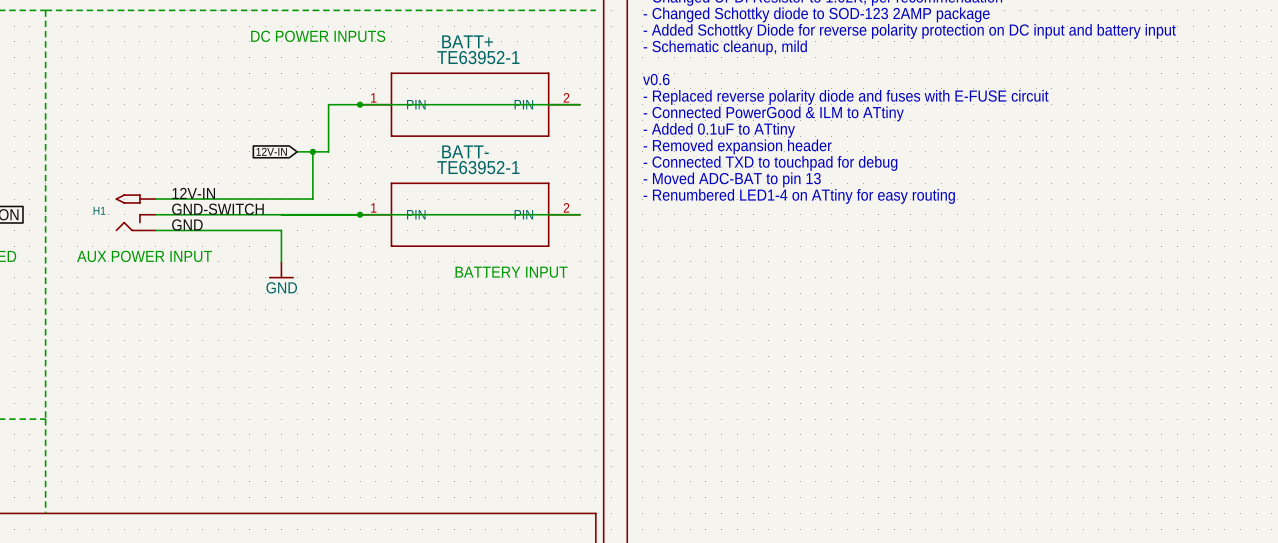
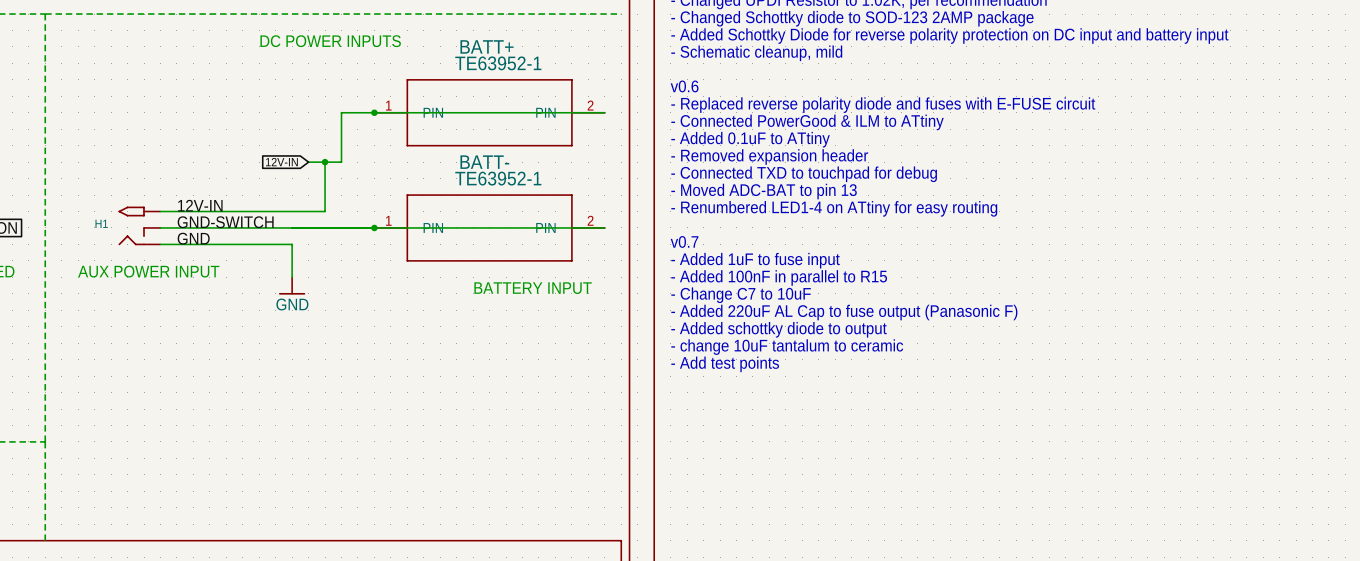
text: none -> v0.7 (684, 241)
text: none -> - Added 1uF to fuse input (755, 260)
text: none -> - Added 100nF in parallel to R15 (779, 277)
text: none -> - Change C7 to 10uF (741, 295)
text: none -> - Added 220uF AL Cap to fuse output (Panasonic F) (844, 312)
text: none -> - Added schottky diode to output (779, 329)
text: none -> - change 10uF tantalum to ceramic (787, 347)
text: none -> - Add test points (725, 364)

